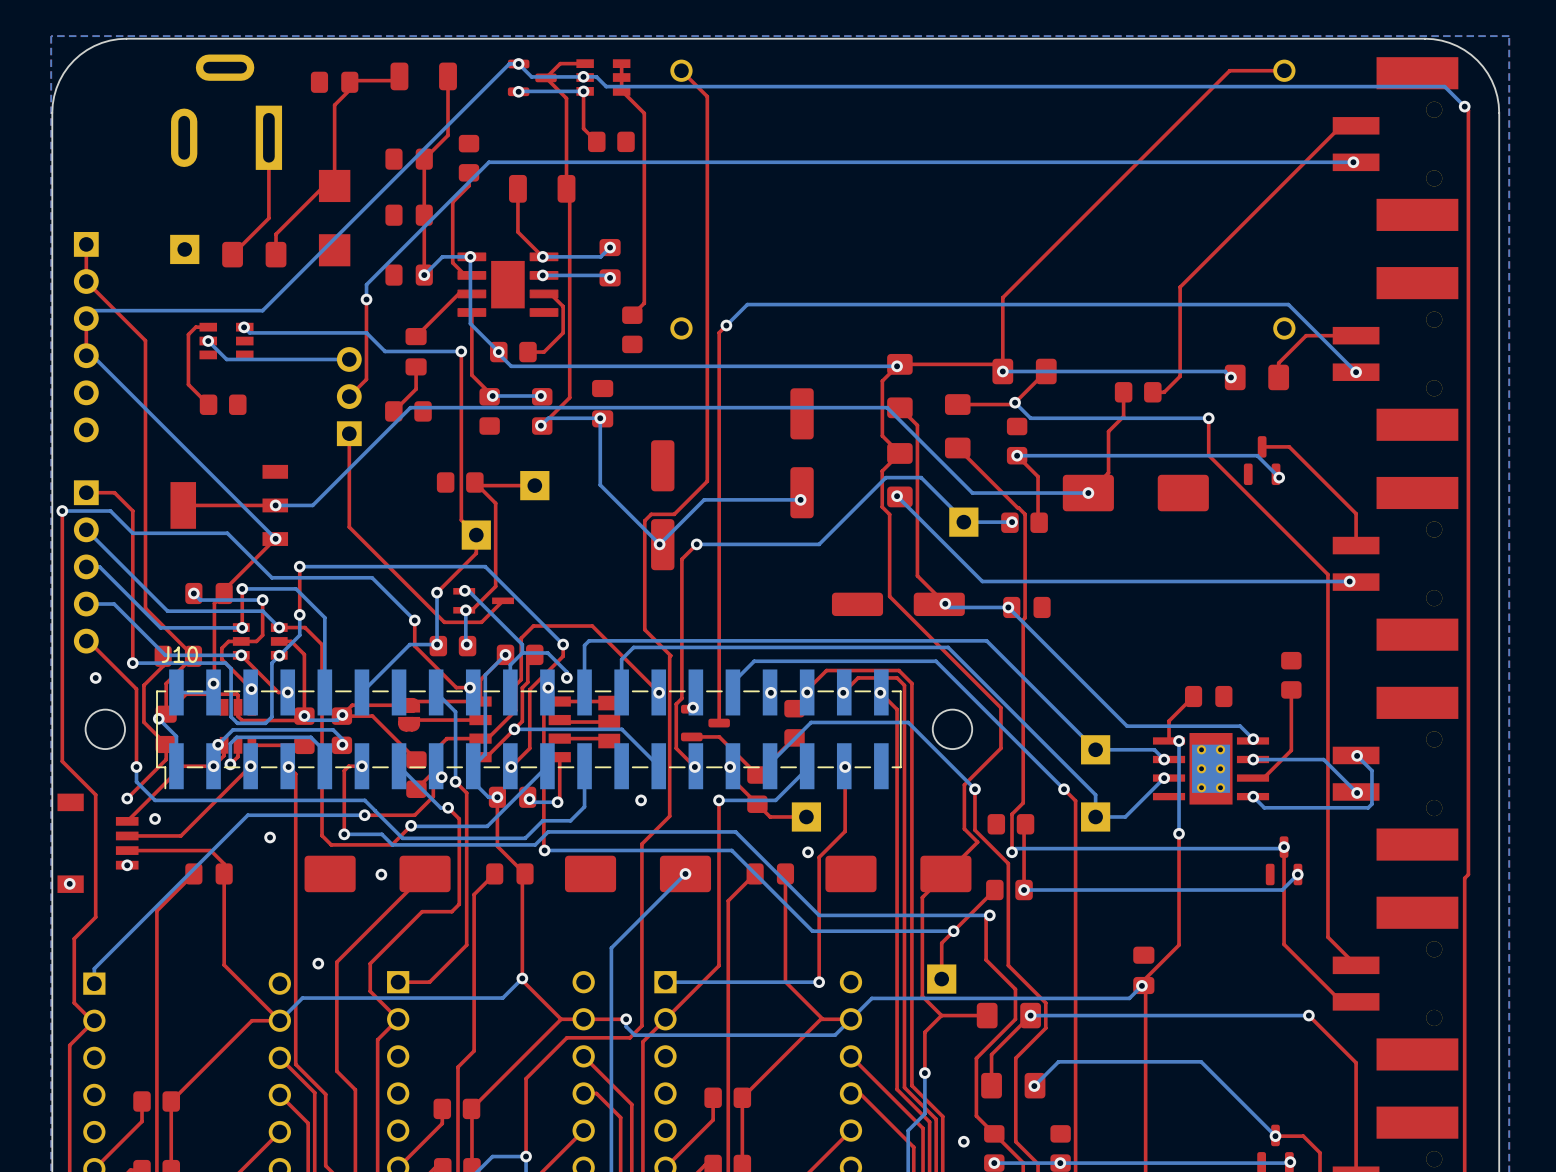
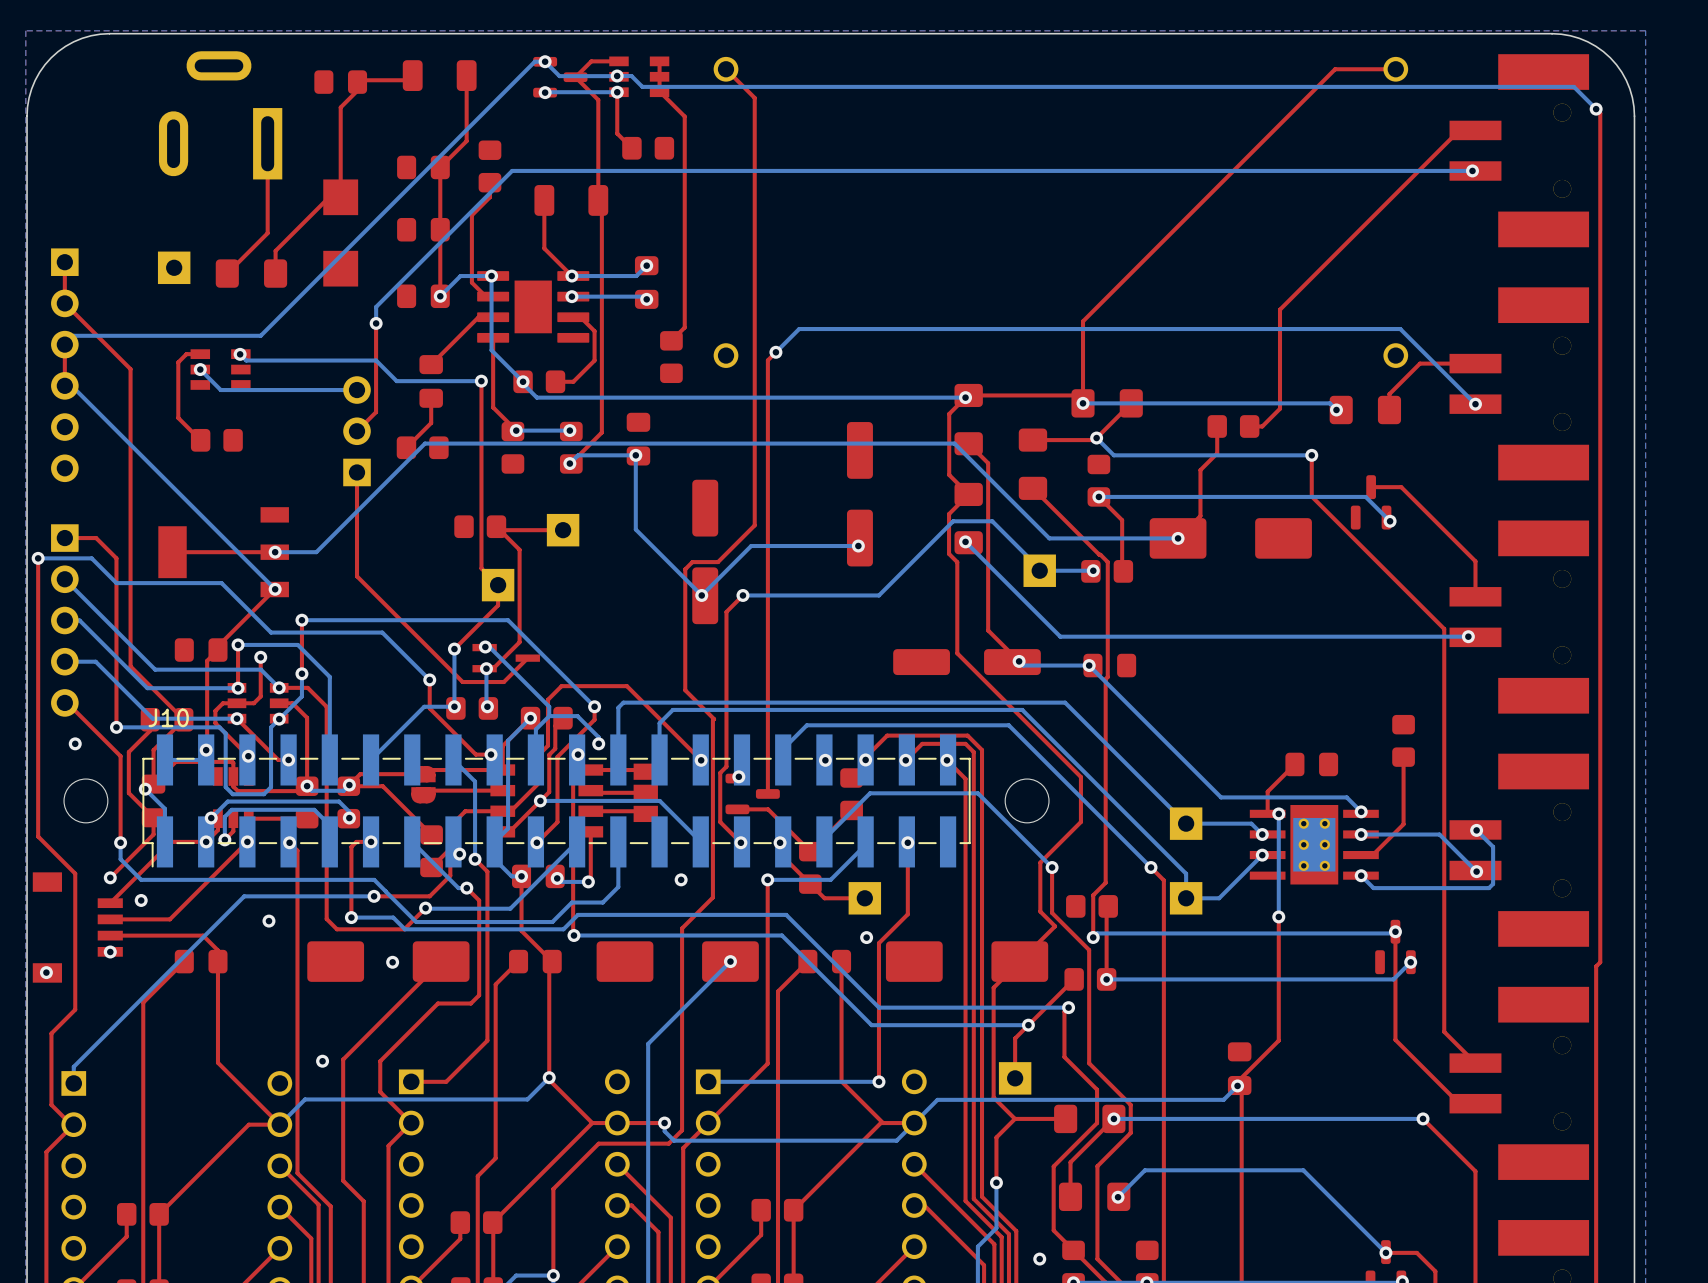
bottom track: (193, 593) (200, 600) (262, 600) -> none
via: (193, 593) -> none

